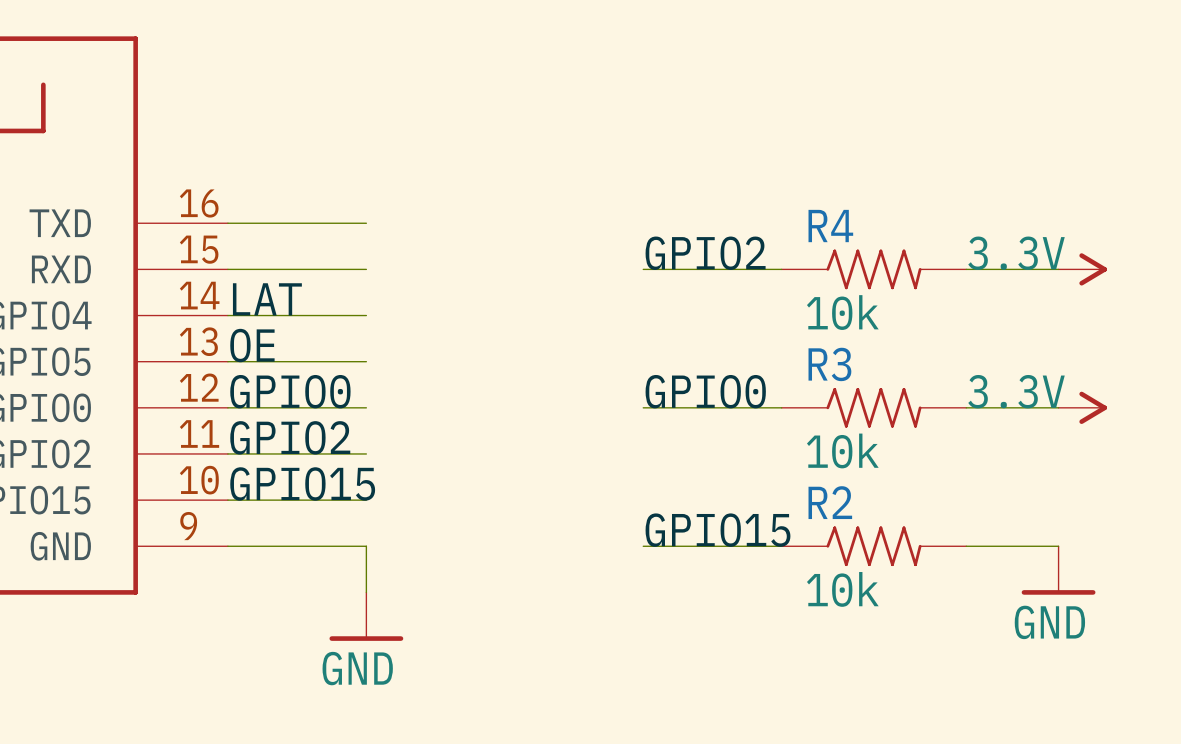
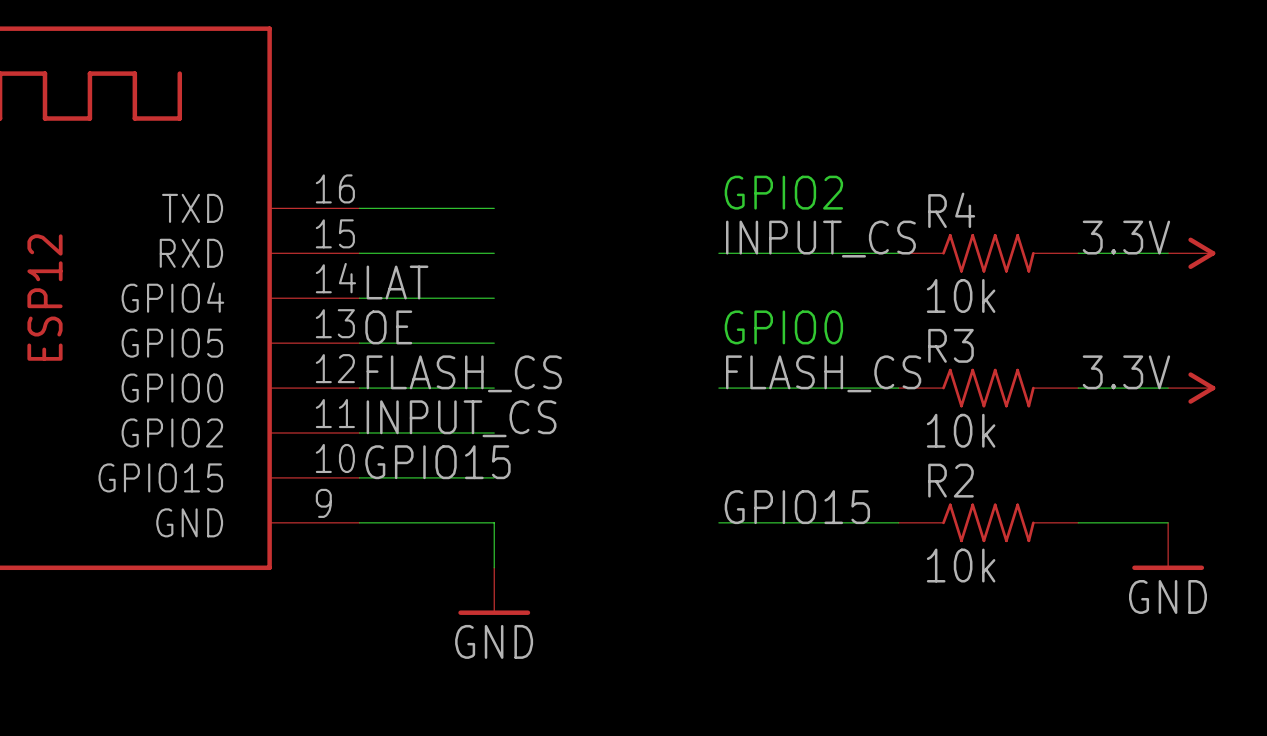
text: none -> GPIO2 (783, 192)
label: GPIO2 (705, 253) -> none
label: none -> INPUT_CS (820, 239)
wire: none -> (718, 253) (763, 253)
text: none -> GPIO0 (783, 327)
label: GPIO0 (290, 391) -> FLASH_CS (464, 373)
label: GPIO0 (705, 391) -> none
label: none -> FLASH_CS (823, 373)
wire: none -> (718, 388) (763, 388)
label: GPIO2 (290, 437) -> INPUT_CS (461, 418)
label position: GPIO15 (717, 530) -> GPIO15 (797, 507)
wire: none -> (718, 522) (763, 522)

